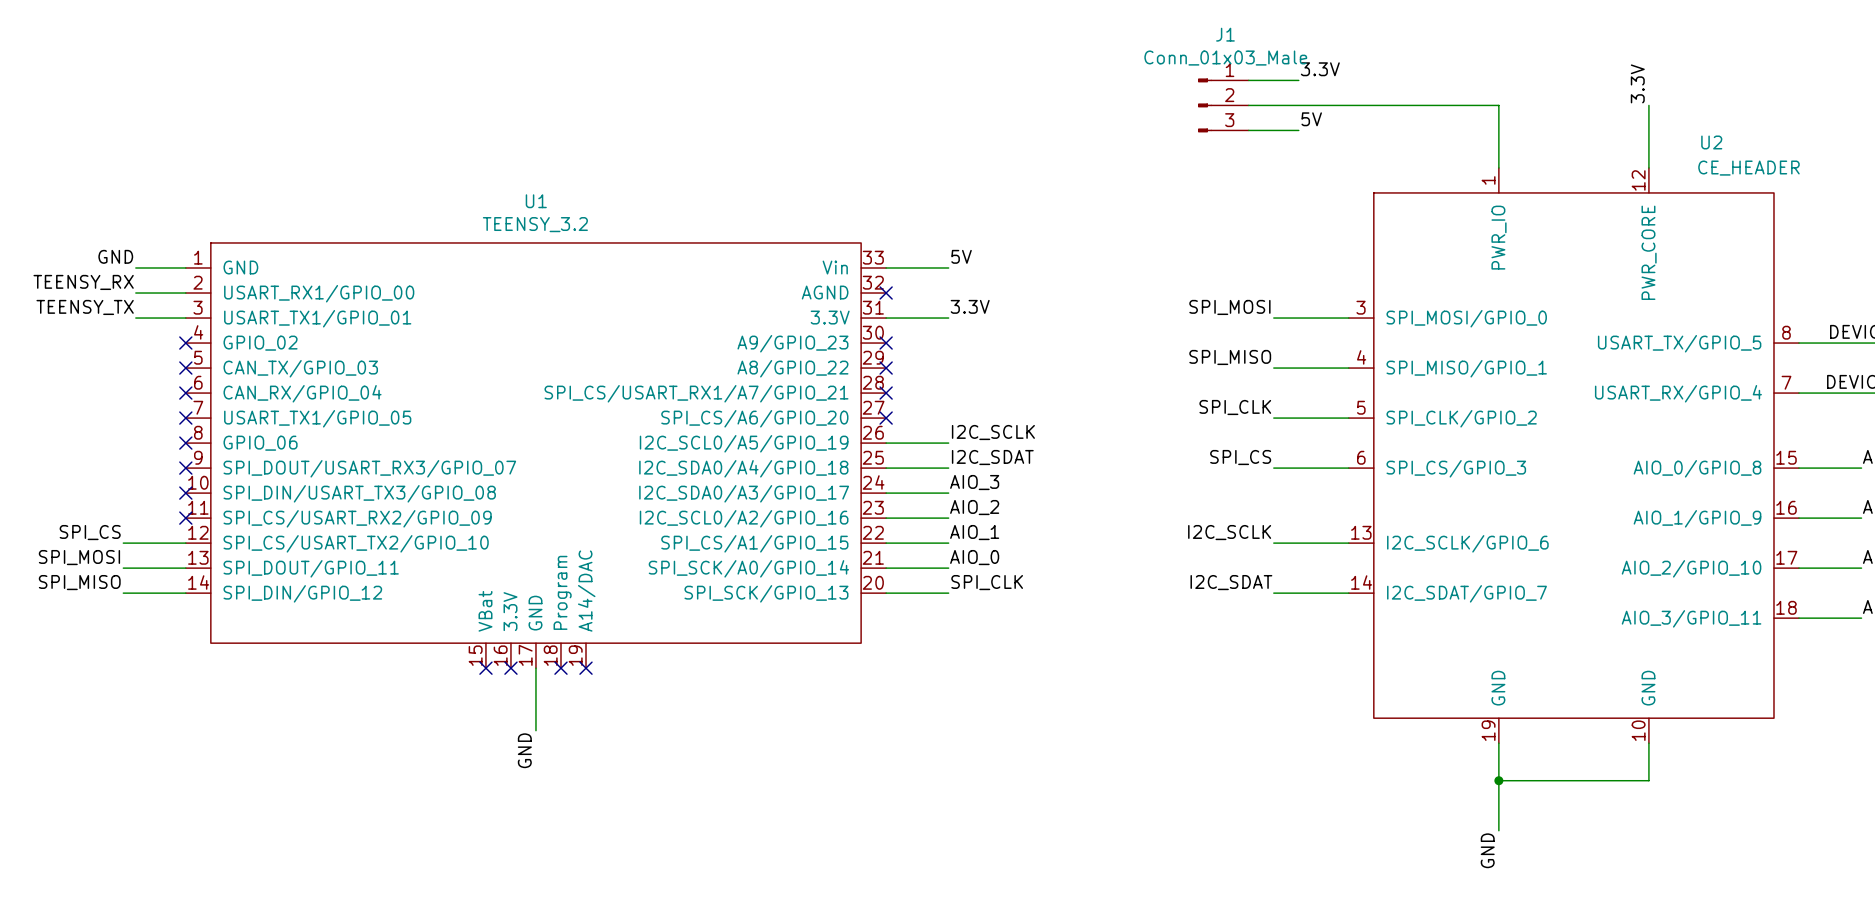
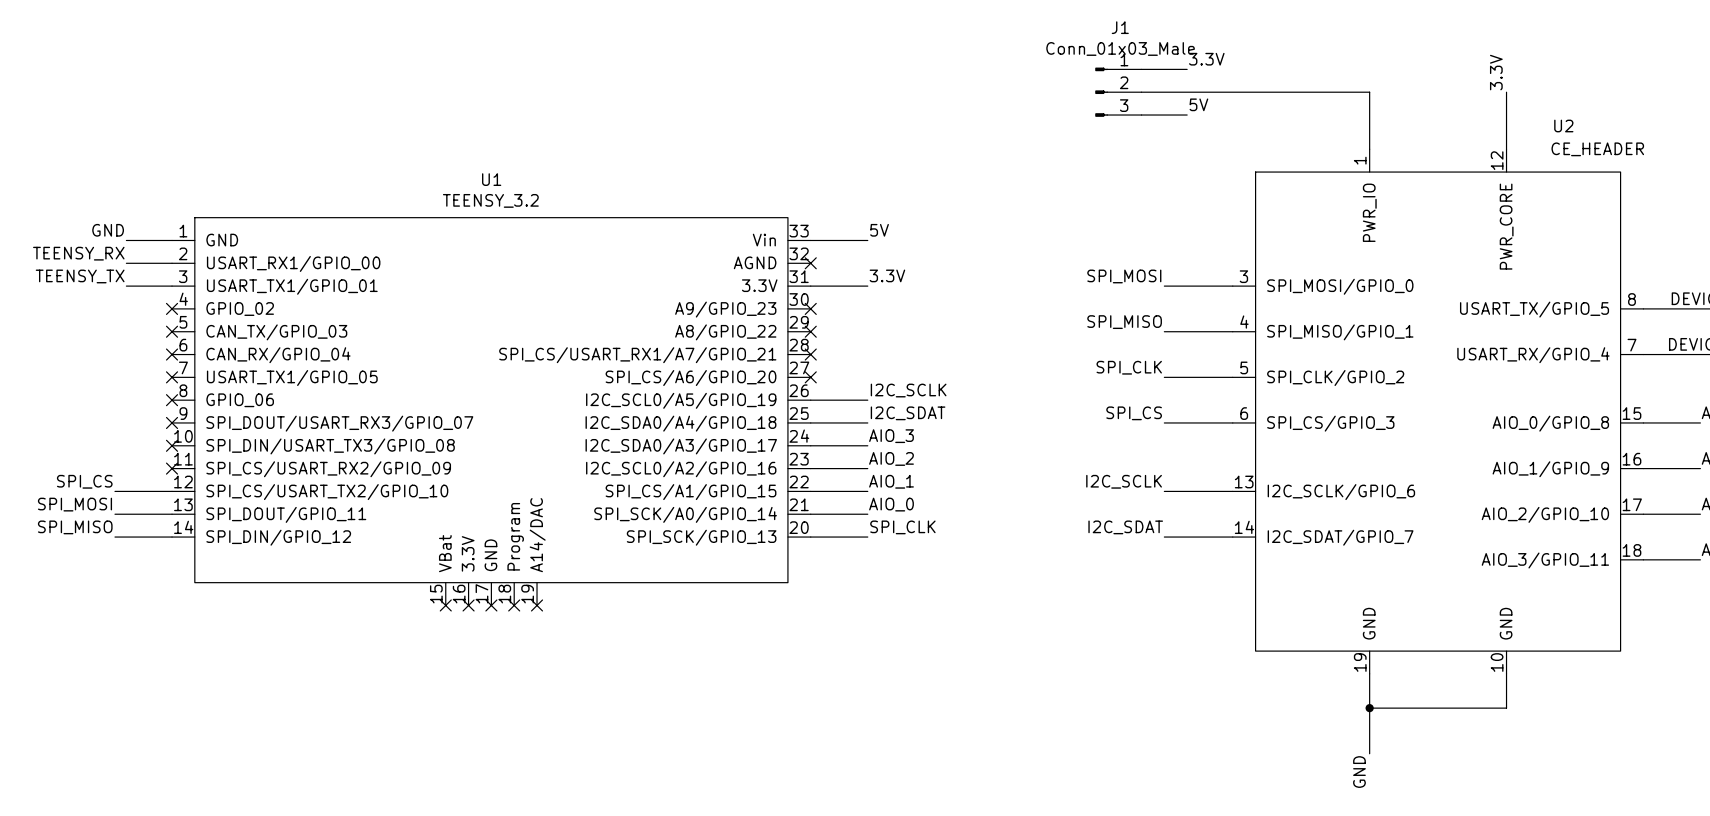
wire: (535, 668) (535, 730) -> none
no-connect mark: none -> (491, 605)
label: GND (524, 750) -> none

